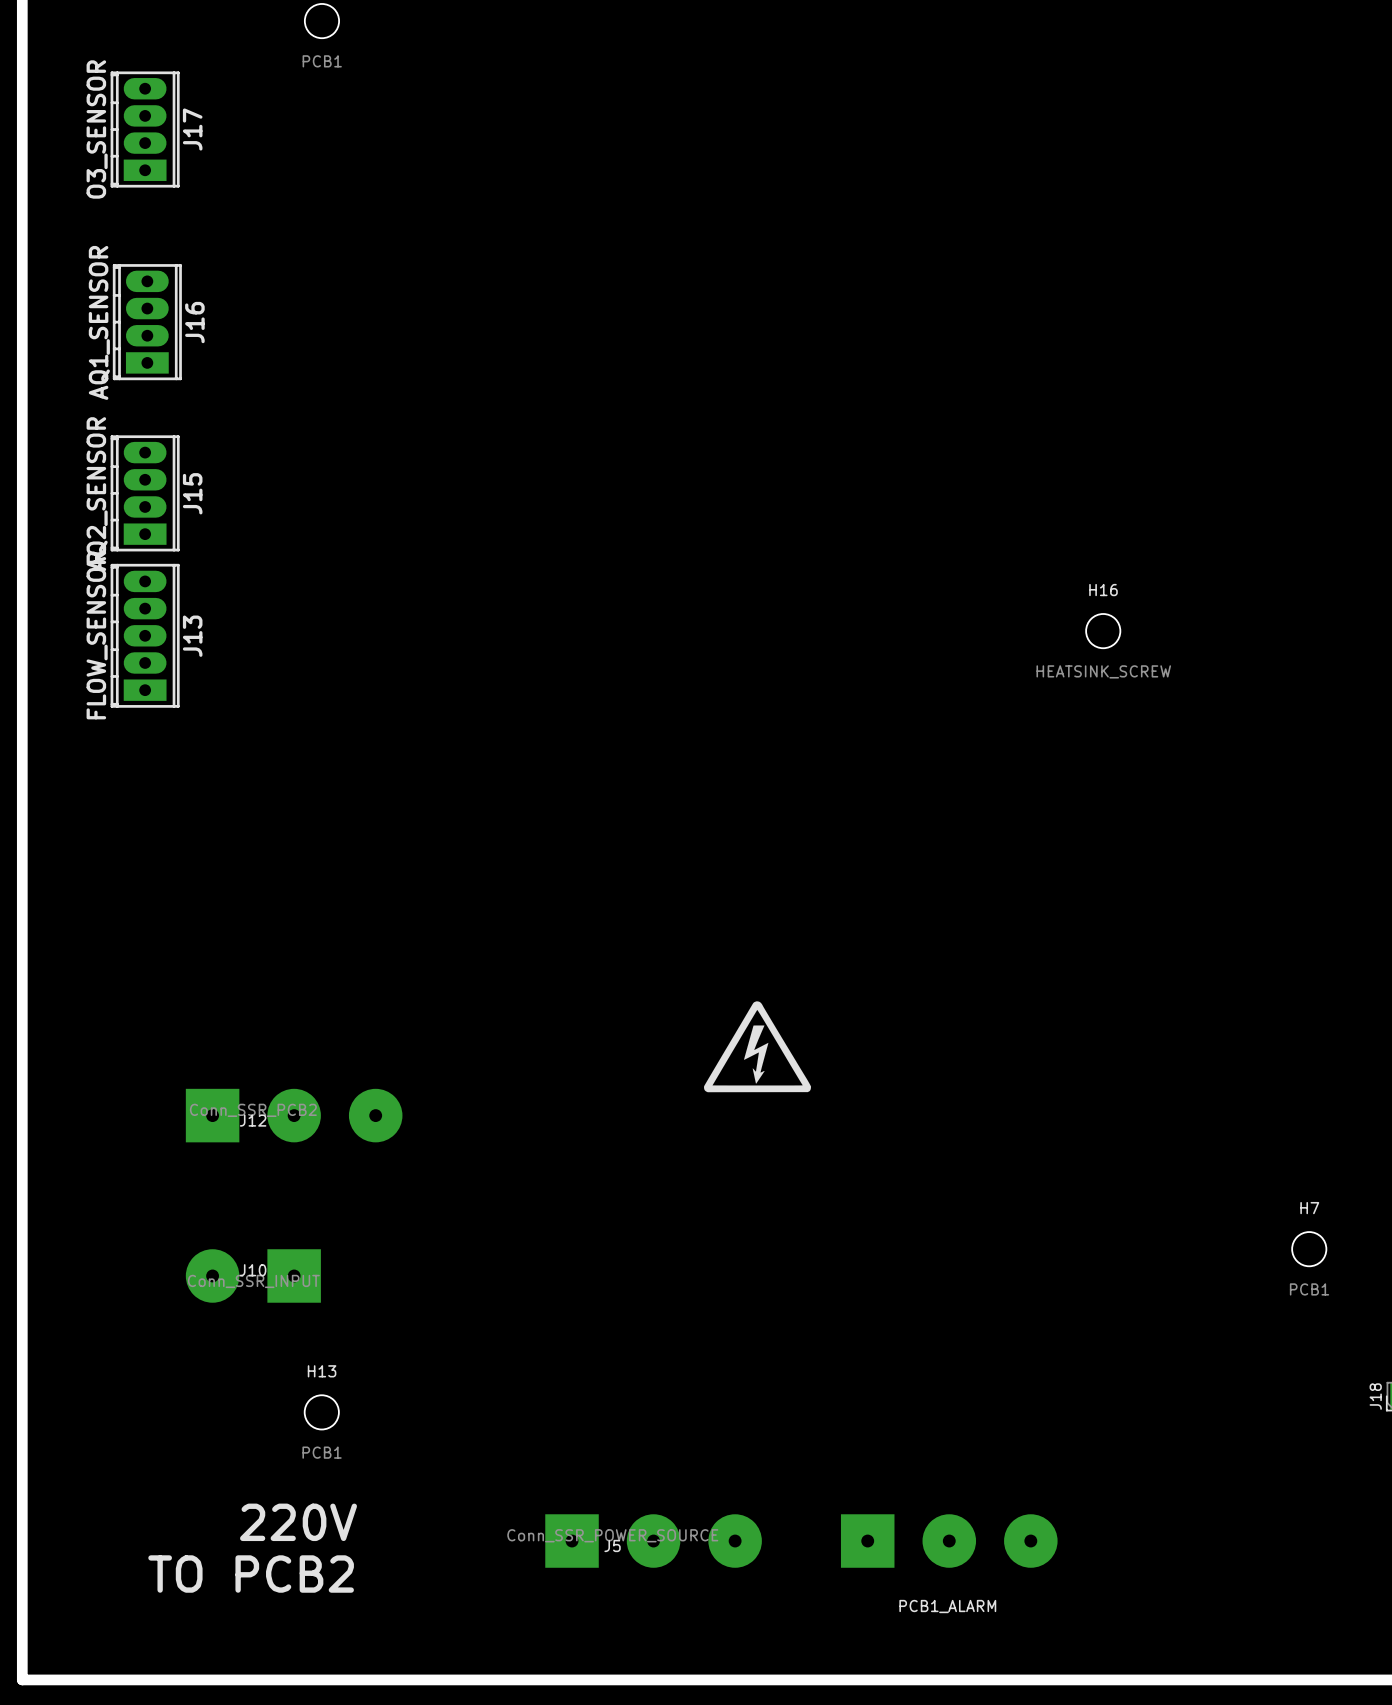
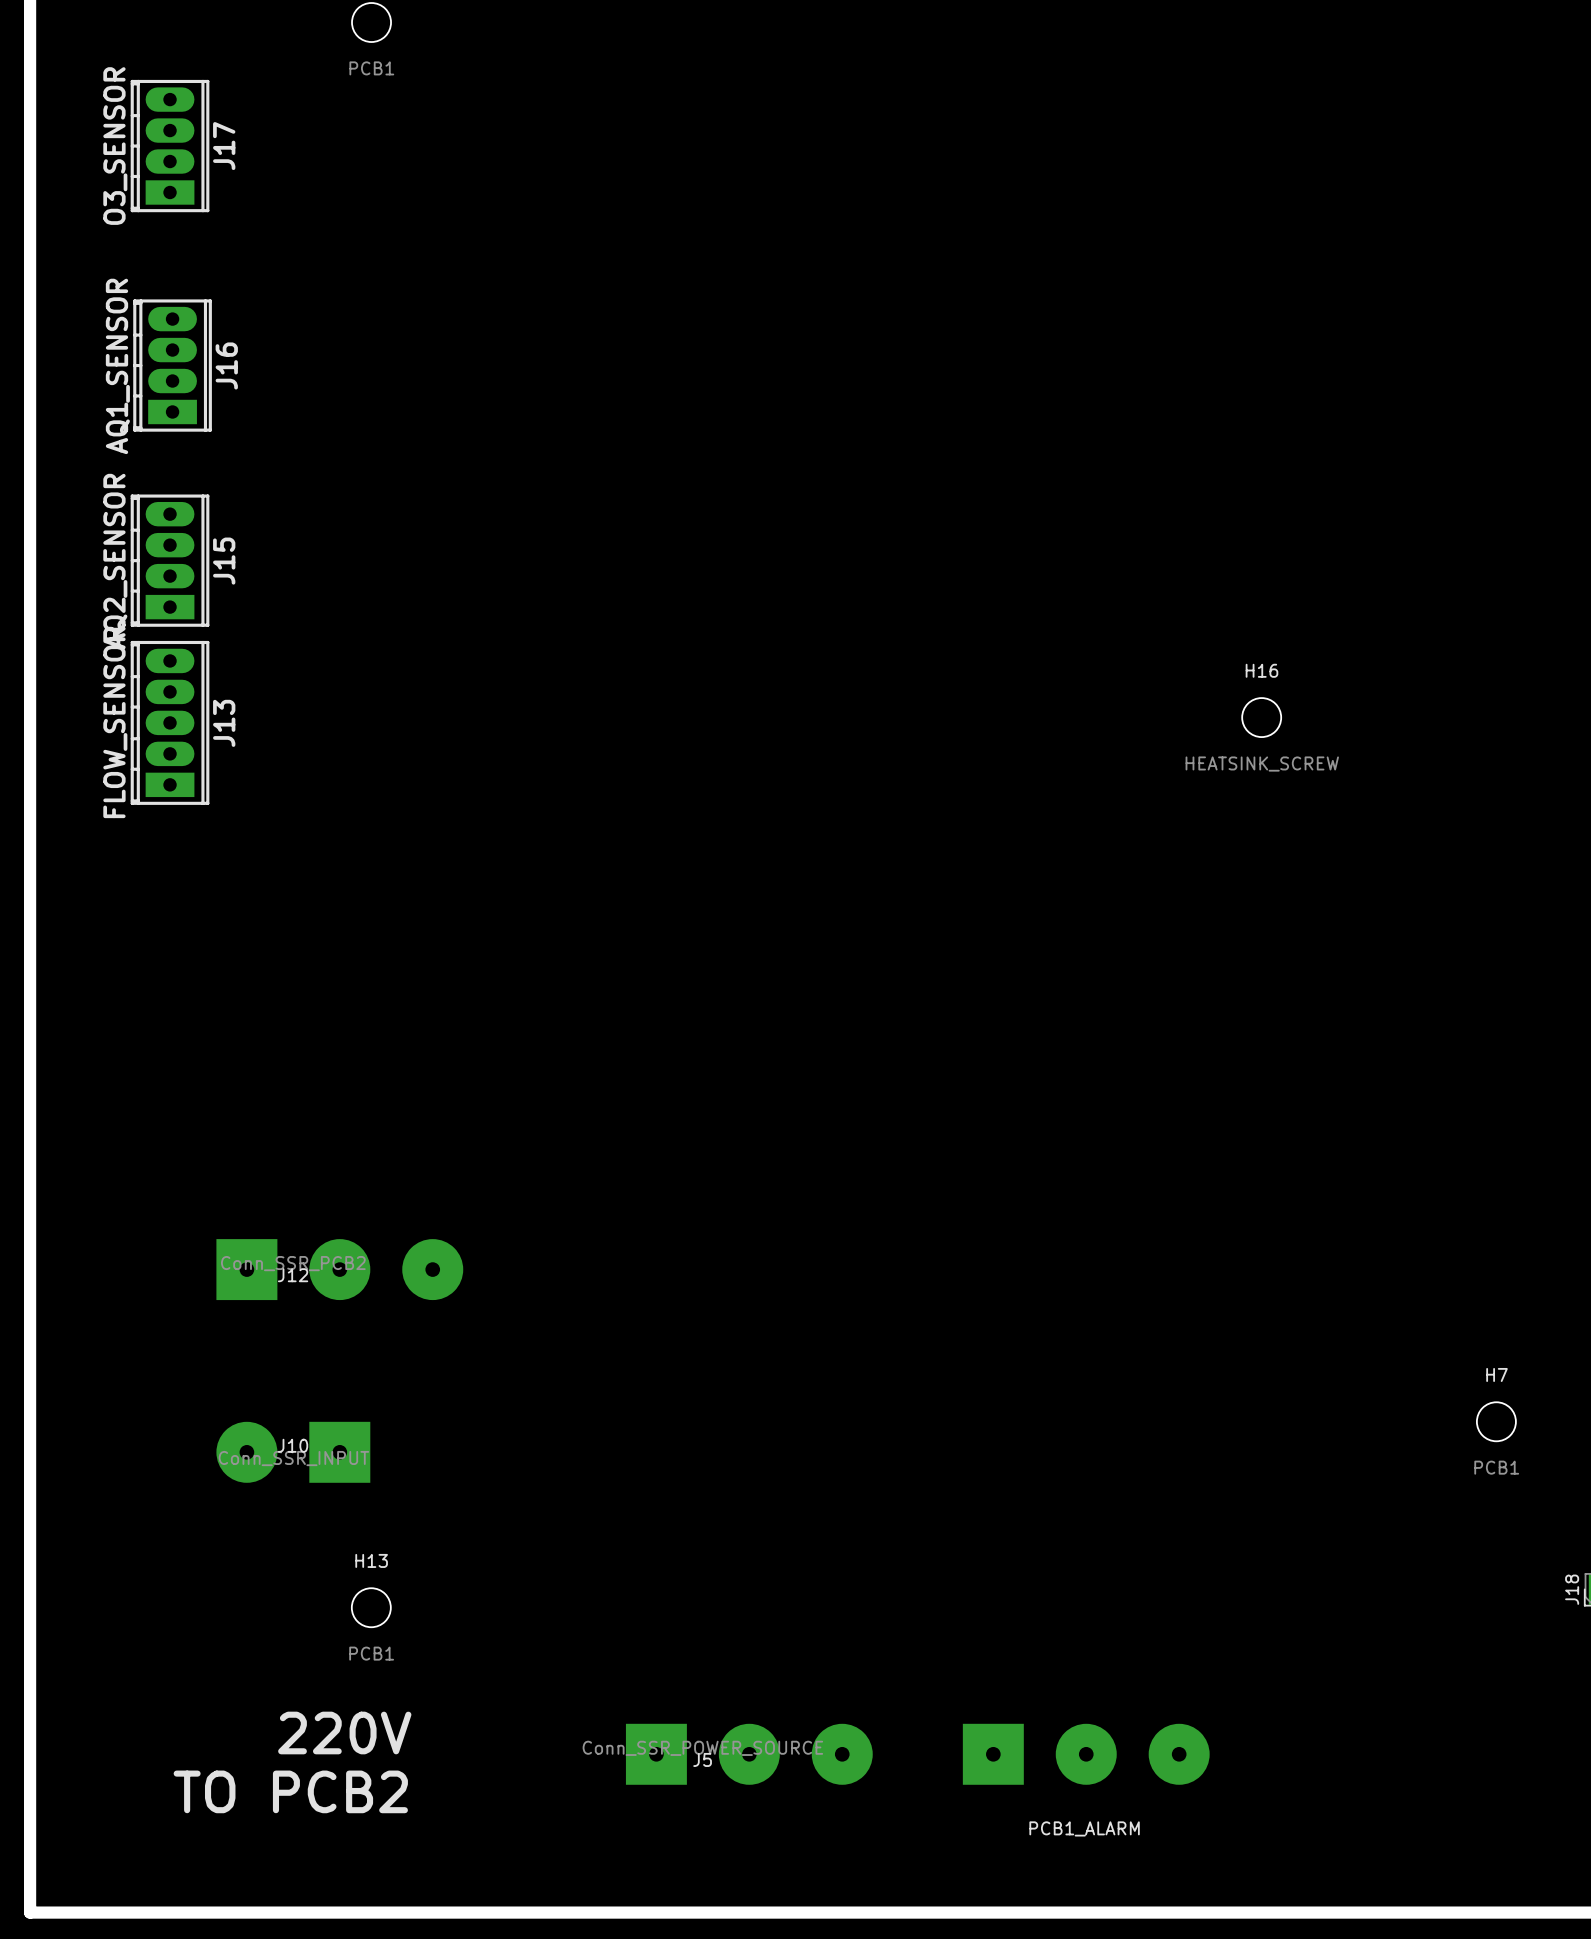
drawing: [704, 1001, 812, 1093] -> none

